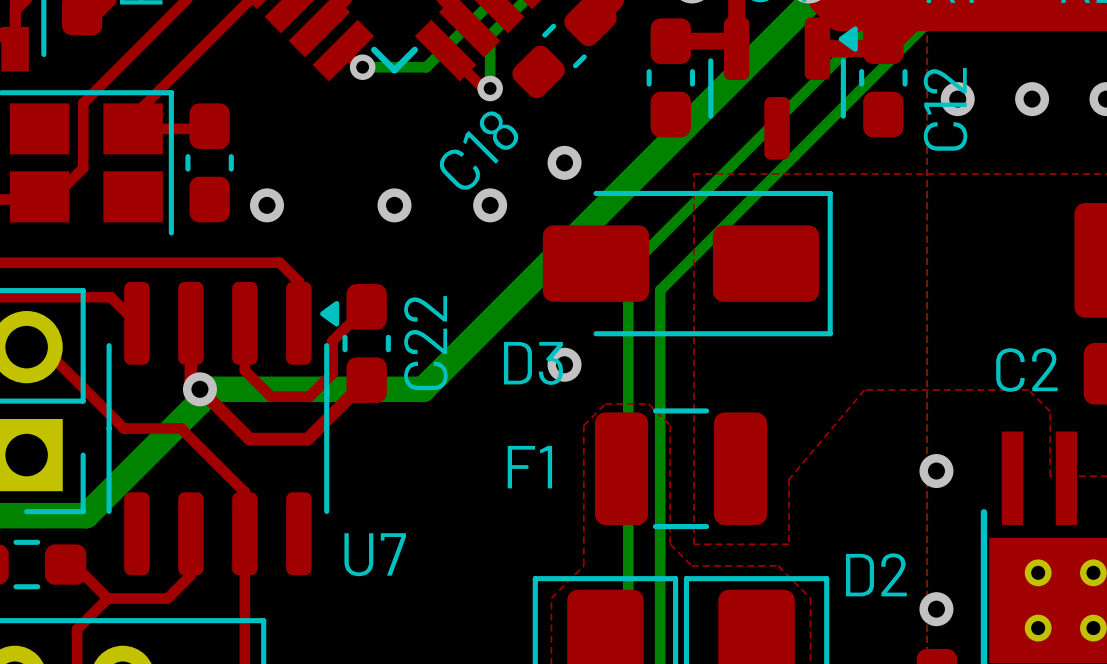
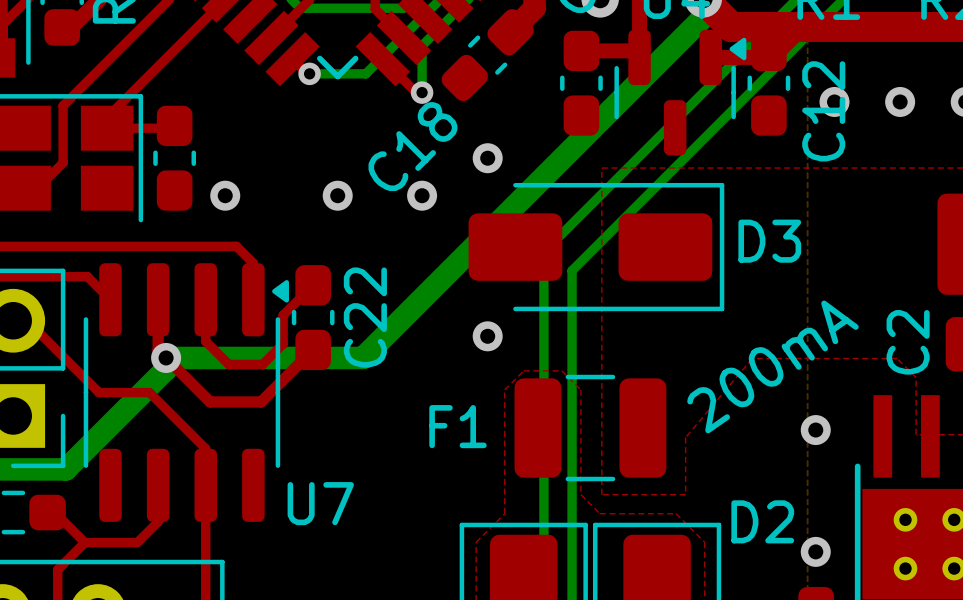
D3 name position: D3 (533, 363) -> D3 (769, 241)
C2 name rotation: 0° (1026, 370) -> 90° counterclockwise (908, 342)
text: none -> 200mA (772, 366)

